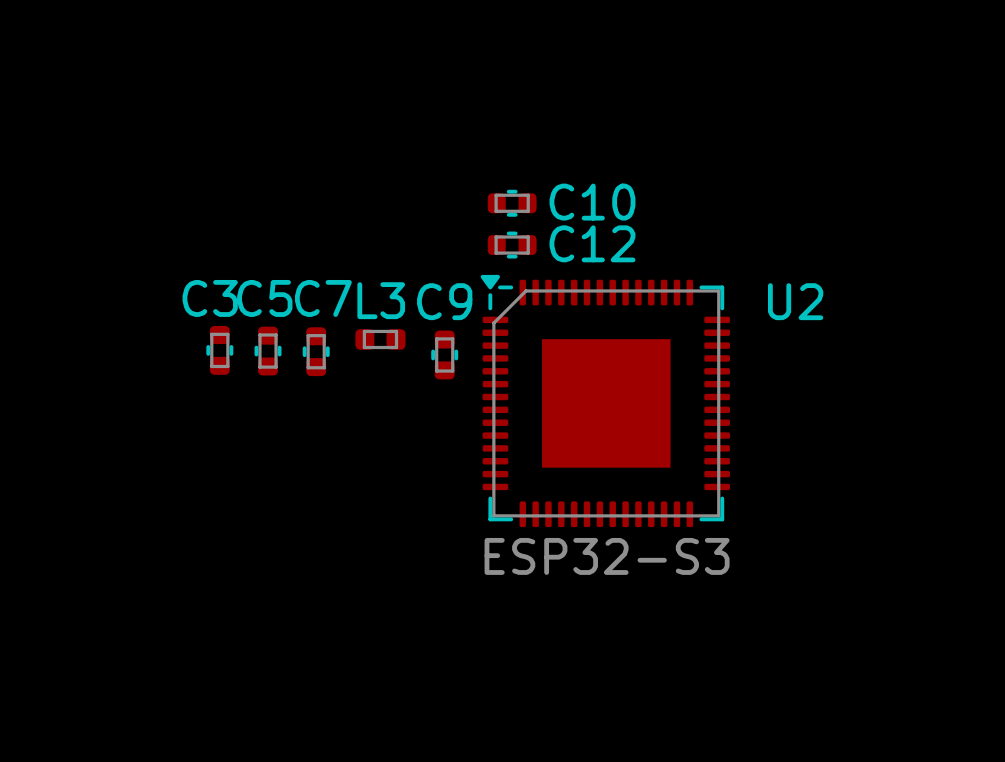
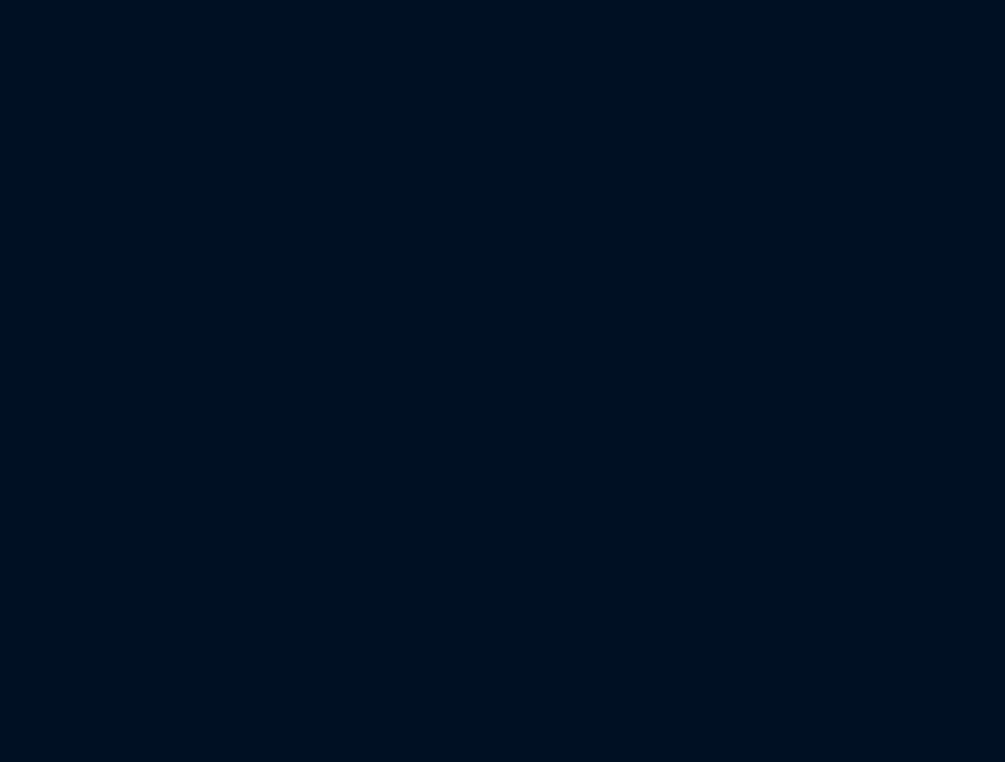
C10: (512, 203) -> none
C12: (512, 245) -> none
L3: (380, 339) -> none
C3: (219, 350) -> none
C5: (268, 351) -> none
C7: (316, 351) -> none
C9: (444, 354) -> none
U2: ESP32-S3 (605, 401) -> none

